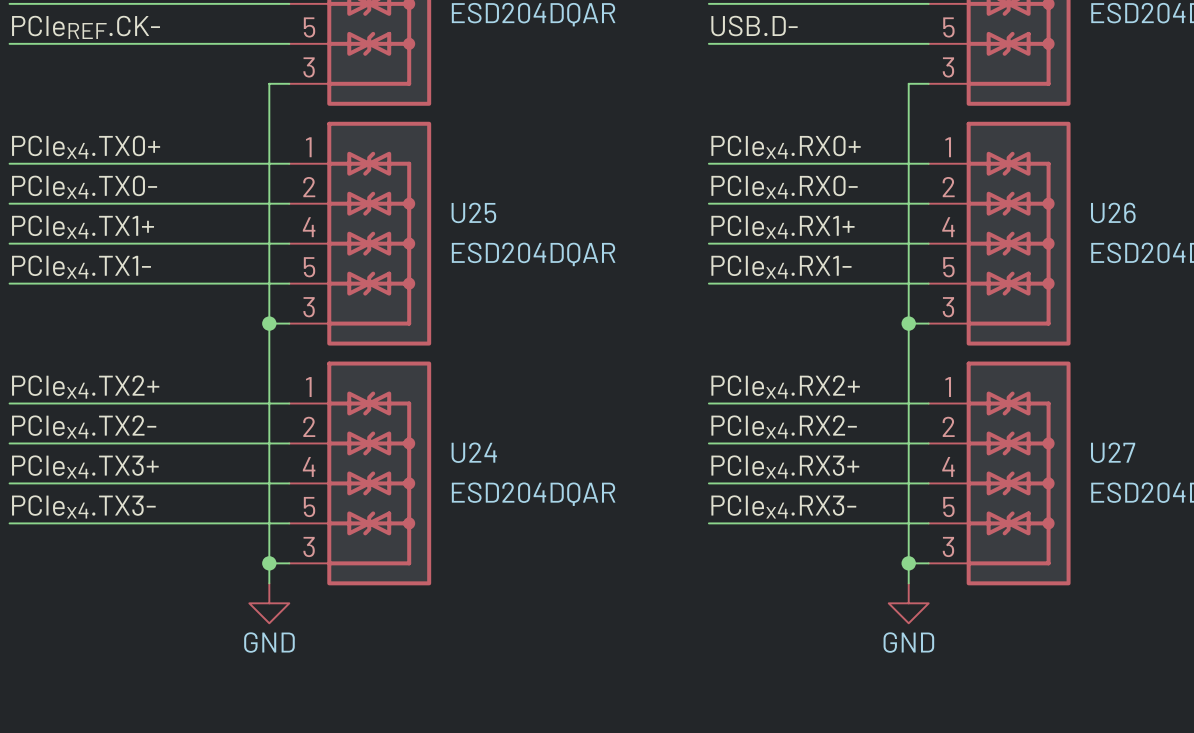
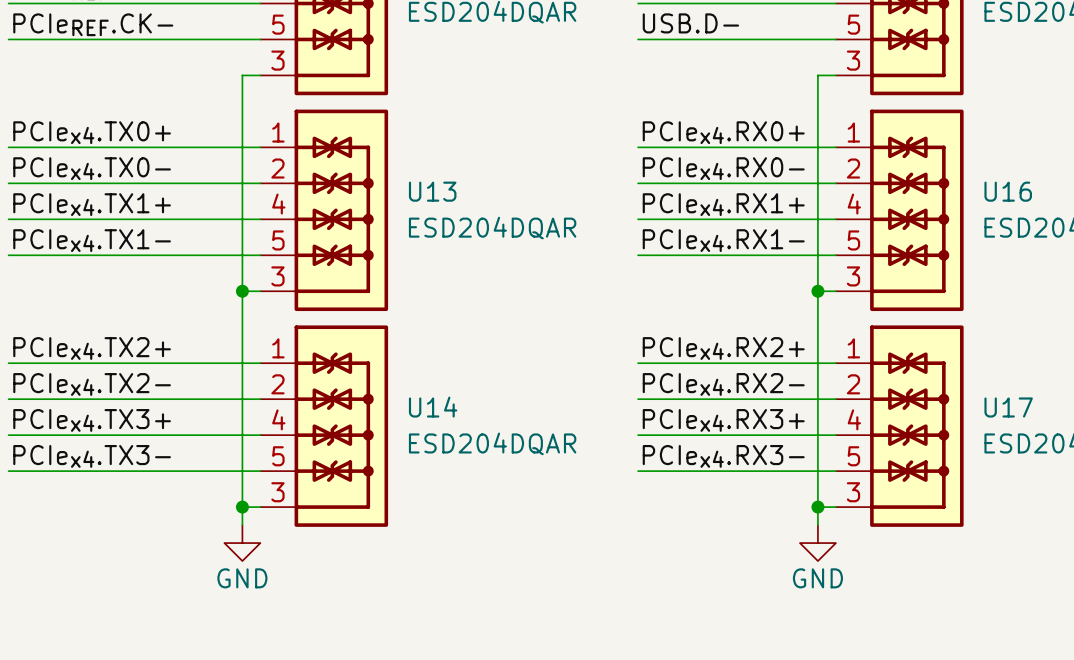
U25 name: U25 (473, 212) -> U13 (432, 191)
U26 name: U26 (1113, 212) -> U16 (1008, 191)
U24 name: U24 (474, 452) -> U14 (433, 407)
U27 name: U27 (1113, 452) -> U17 (1008, 407)

